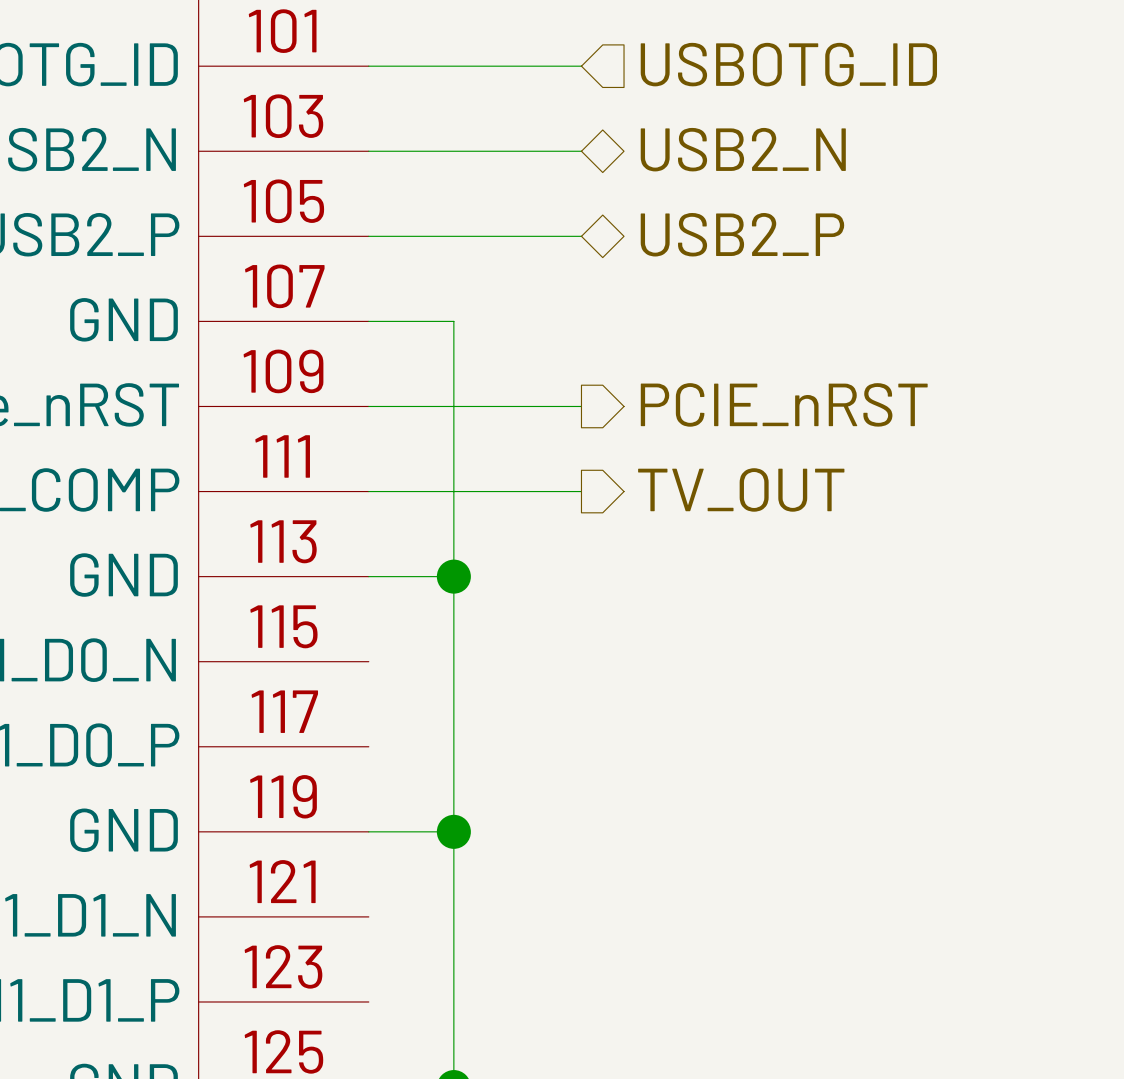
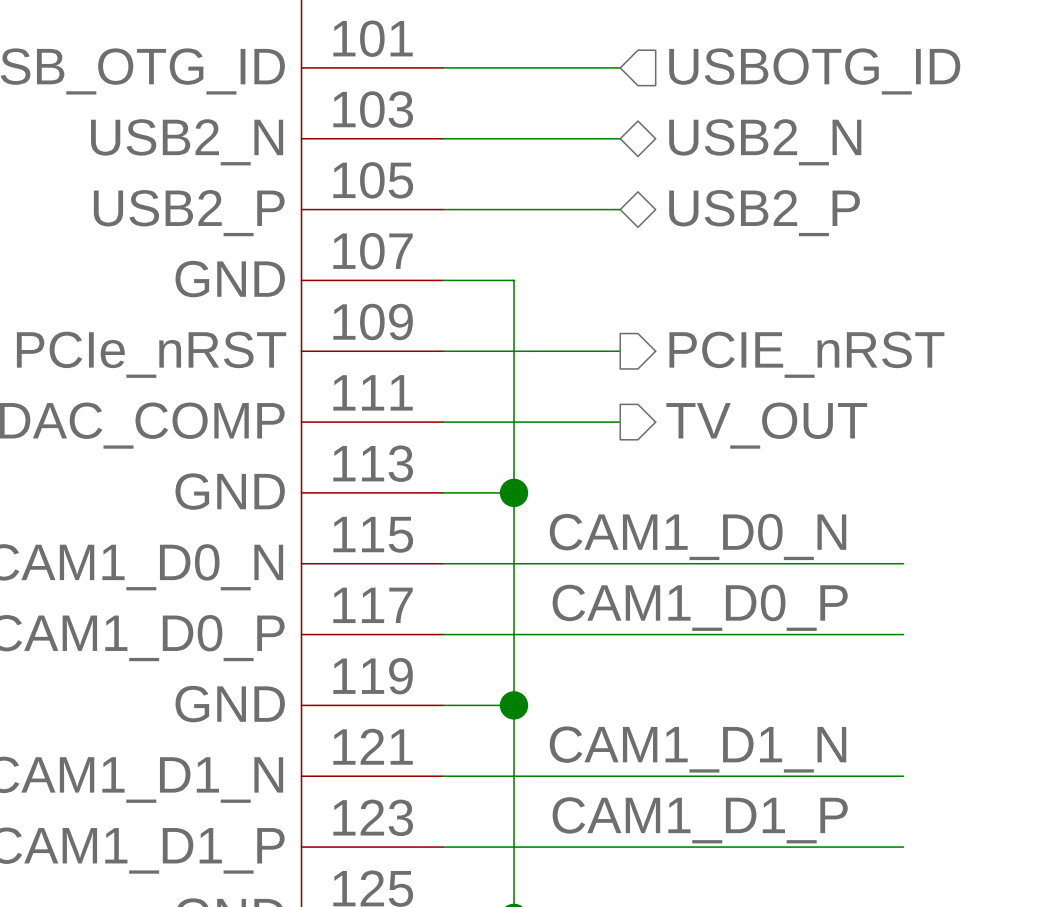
label: none -> CAM1_D0_N (698, 536)
wire: none -> (443, 563) (903, 563)
label: none -> CAM1_D0_P (700, 607)
wire: none -> (443, 634) (903, 634)
label: none -> CAM1_D1_N (698, 749)
wire: none -> (443, 776) (903, 776)
label: none -> CAM1_D1_P (700, 820)
wire: none -> (443, 847) (903, 847)

